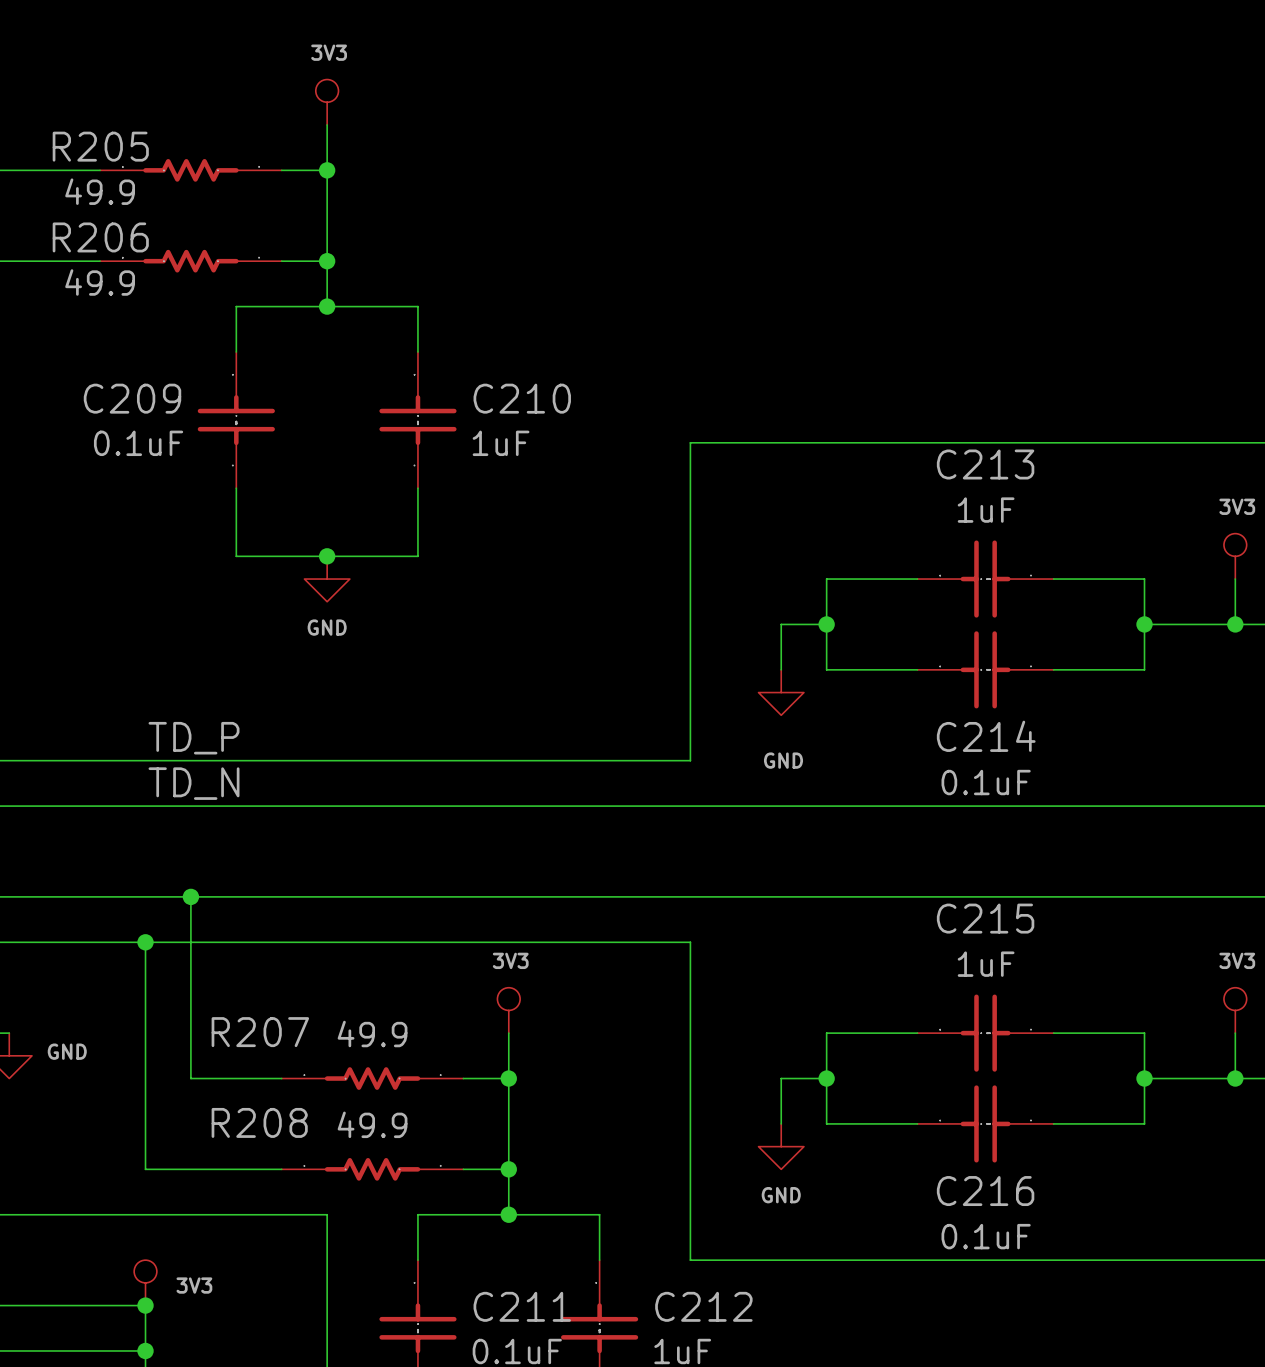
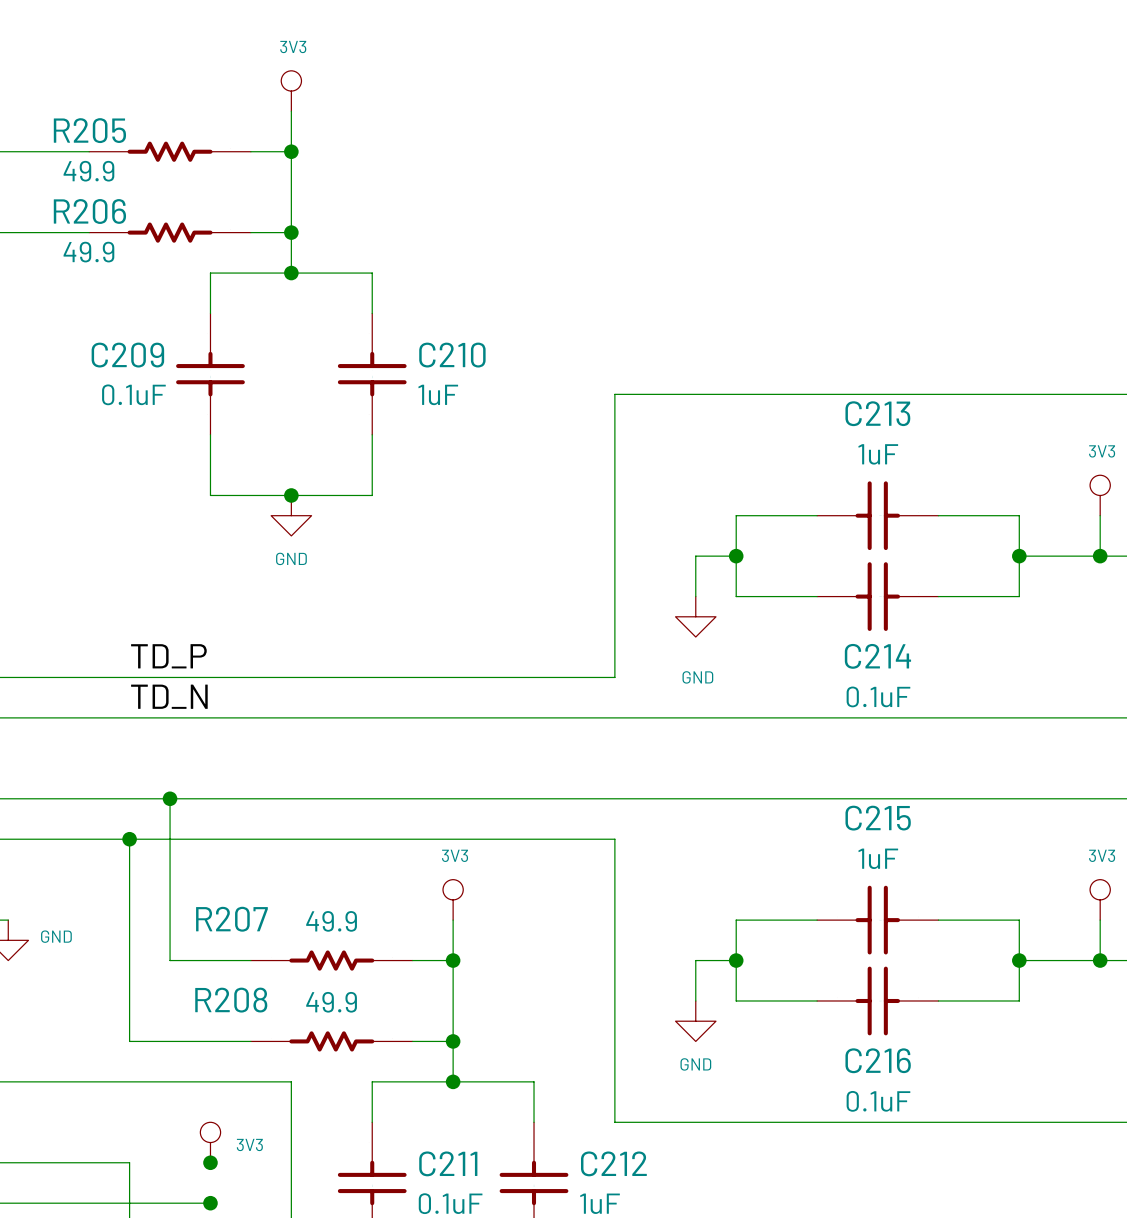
power symbol position: 3V3 (145, 1282) -> 3V3 (210, 1142)
junction: (145, 1305) -> none
junction: none -> (210, 1162)
wire: none -> (129, 1203) (210, 1203)
junction: (145, 1350) -> none
junction: none -> (210, 1203)

